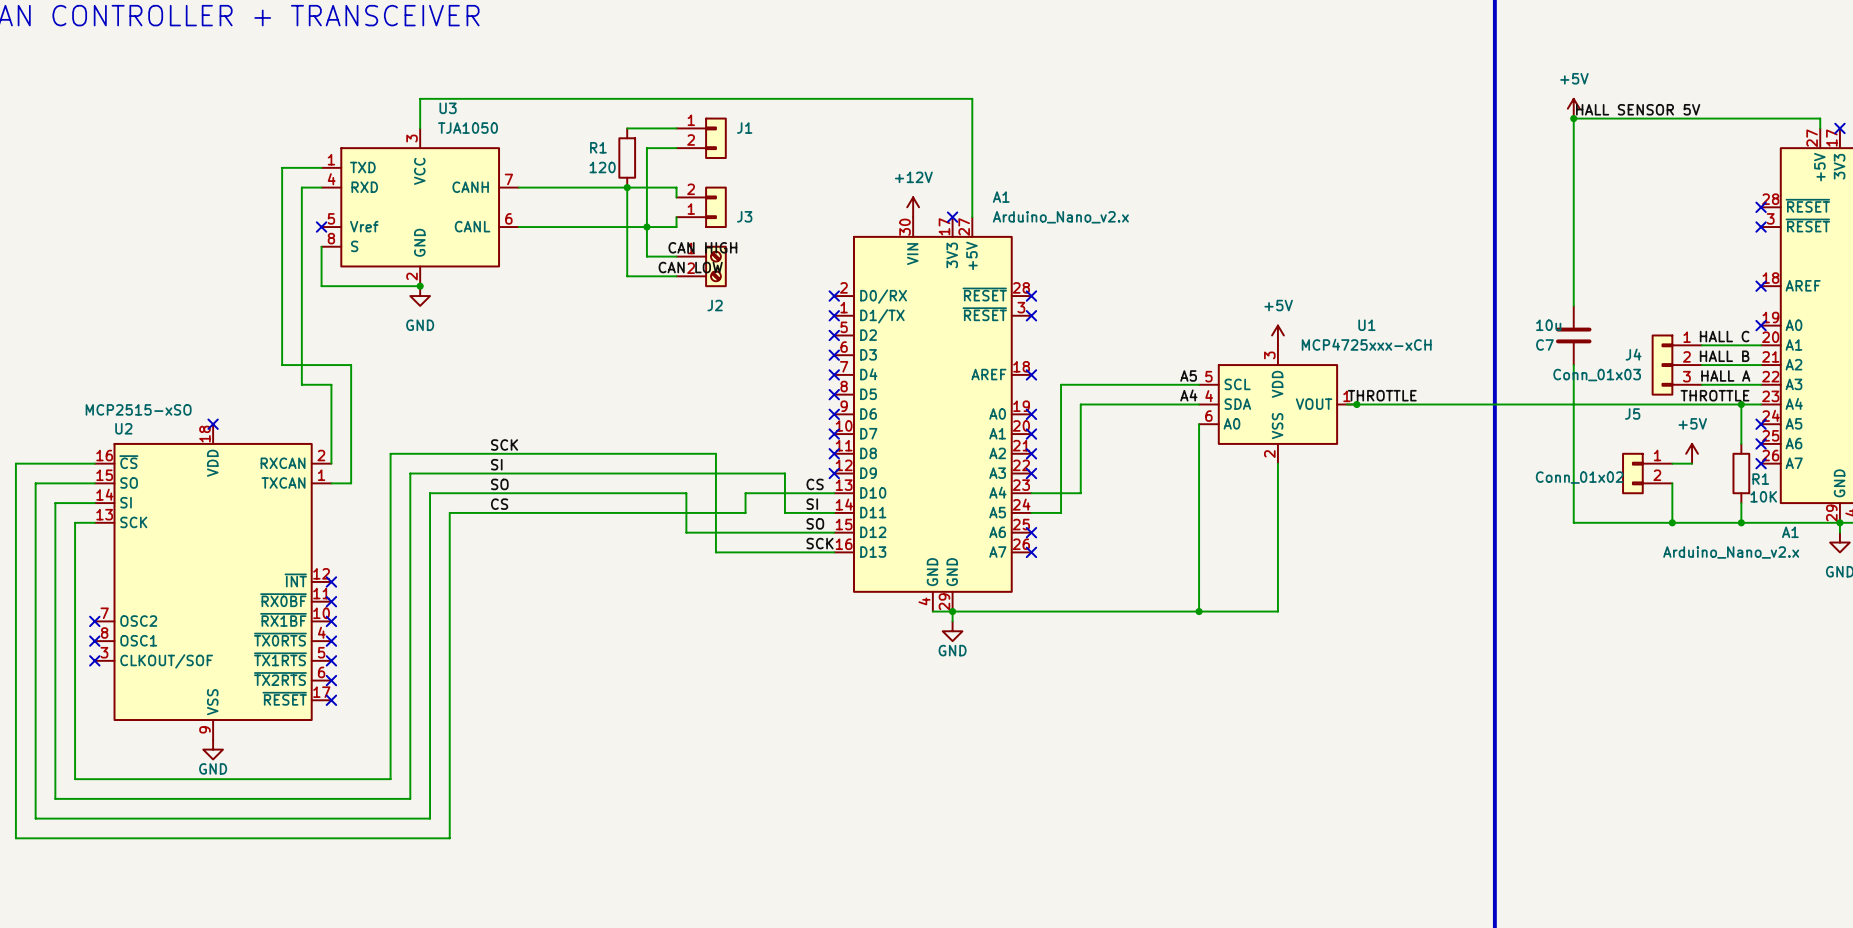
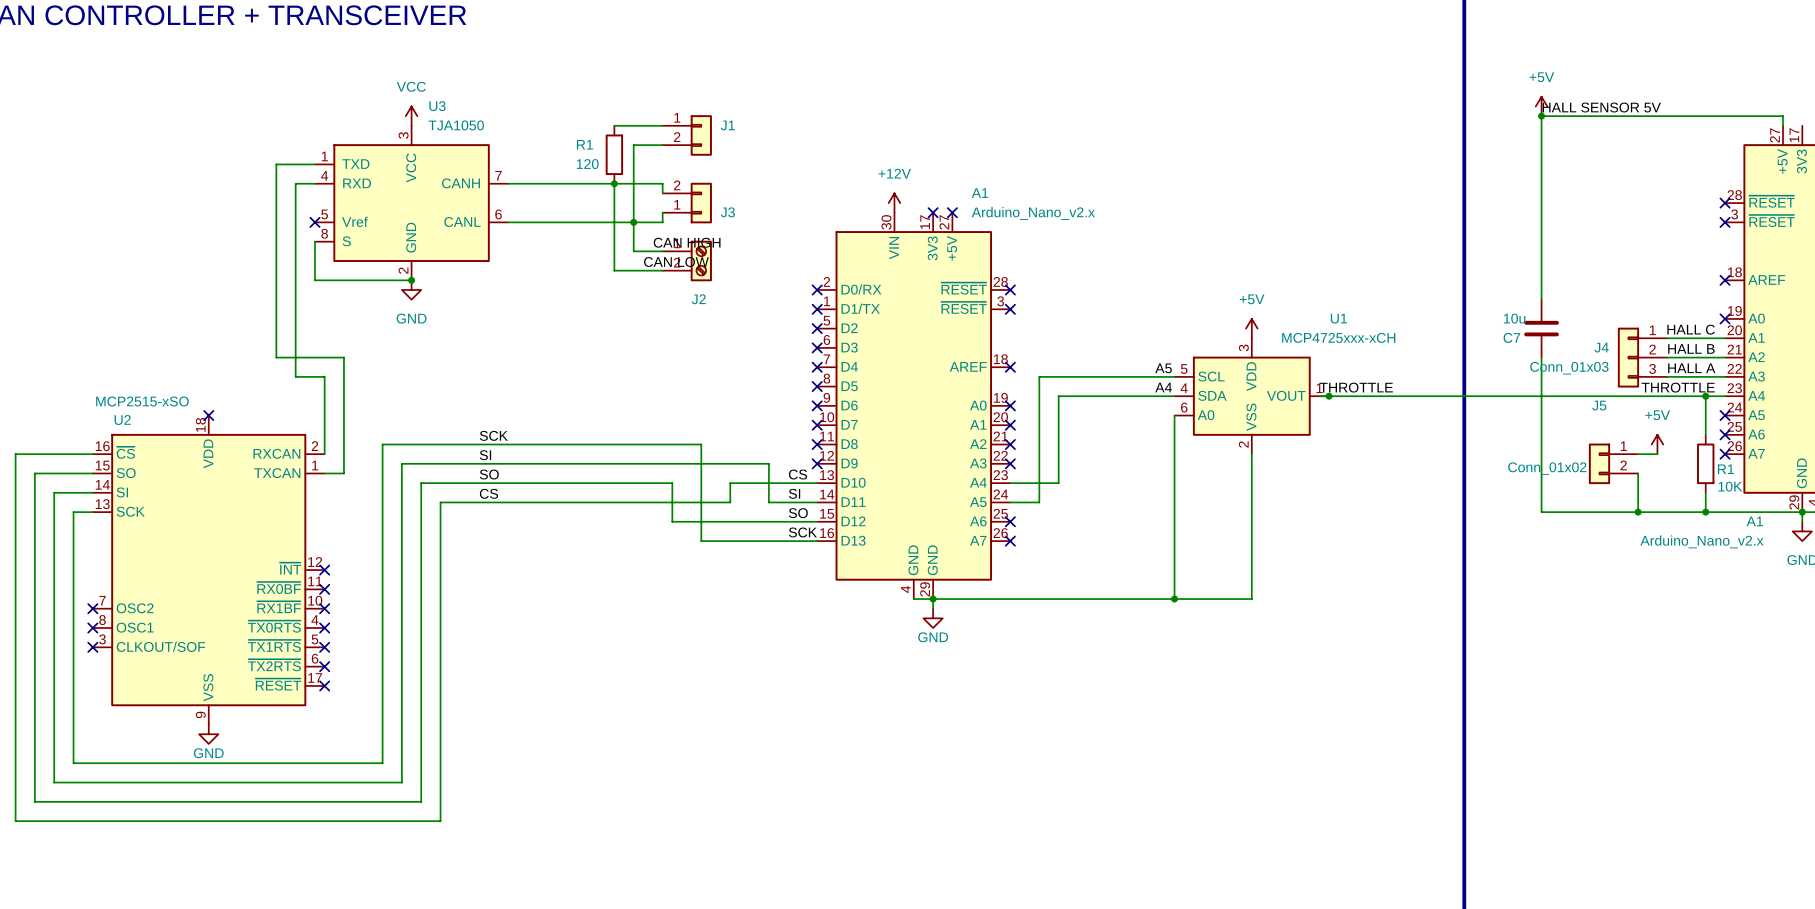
power symbol: none -> VCC (411, 116)
wire: (420, 128) (420, 98) (972, 98) (972, 217) -> none
no-connect mark: (1839, 128) -> none
no-connect mark: none -> (952, 212)

